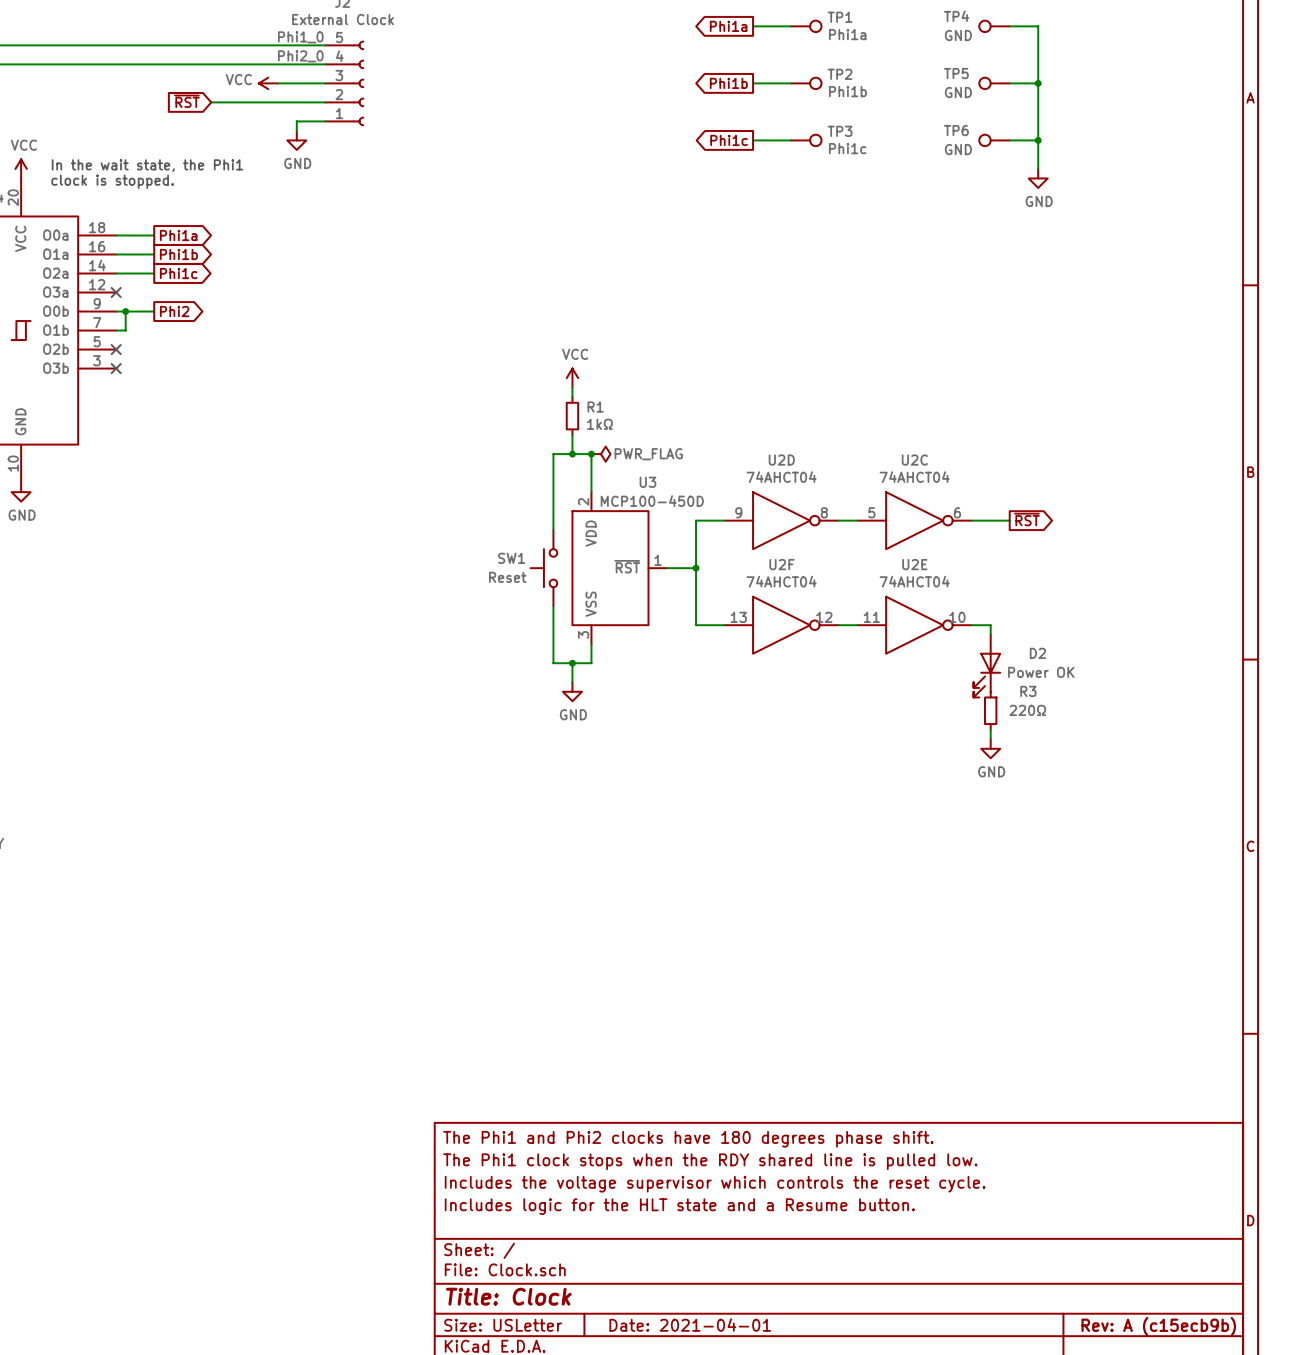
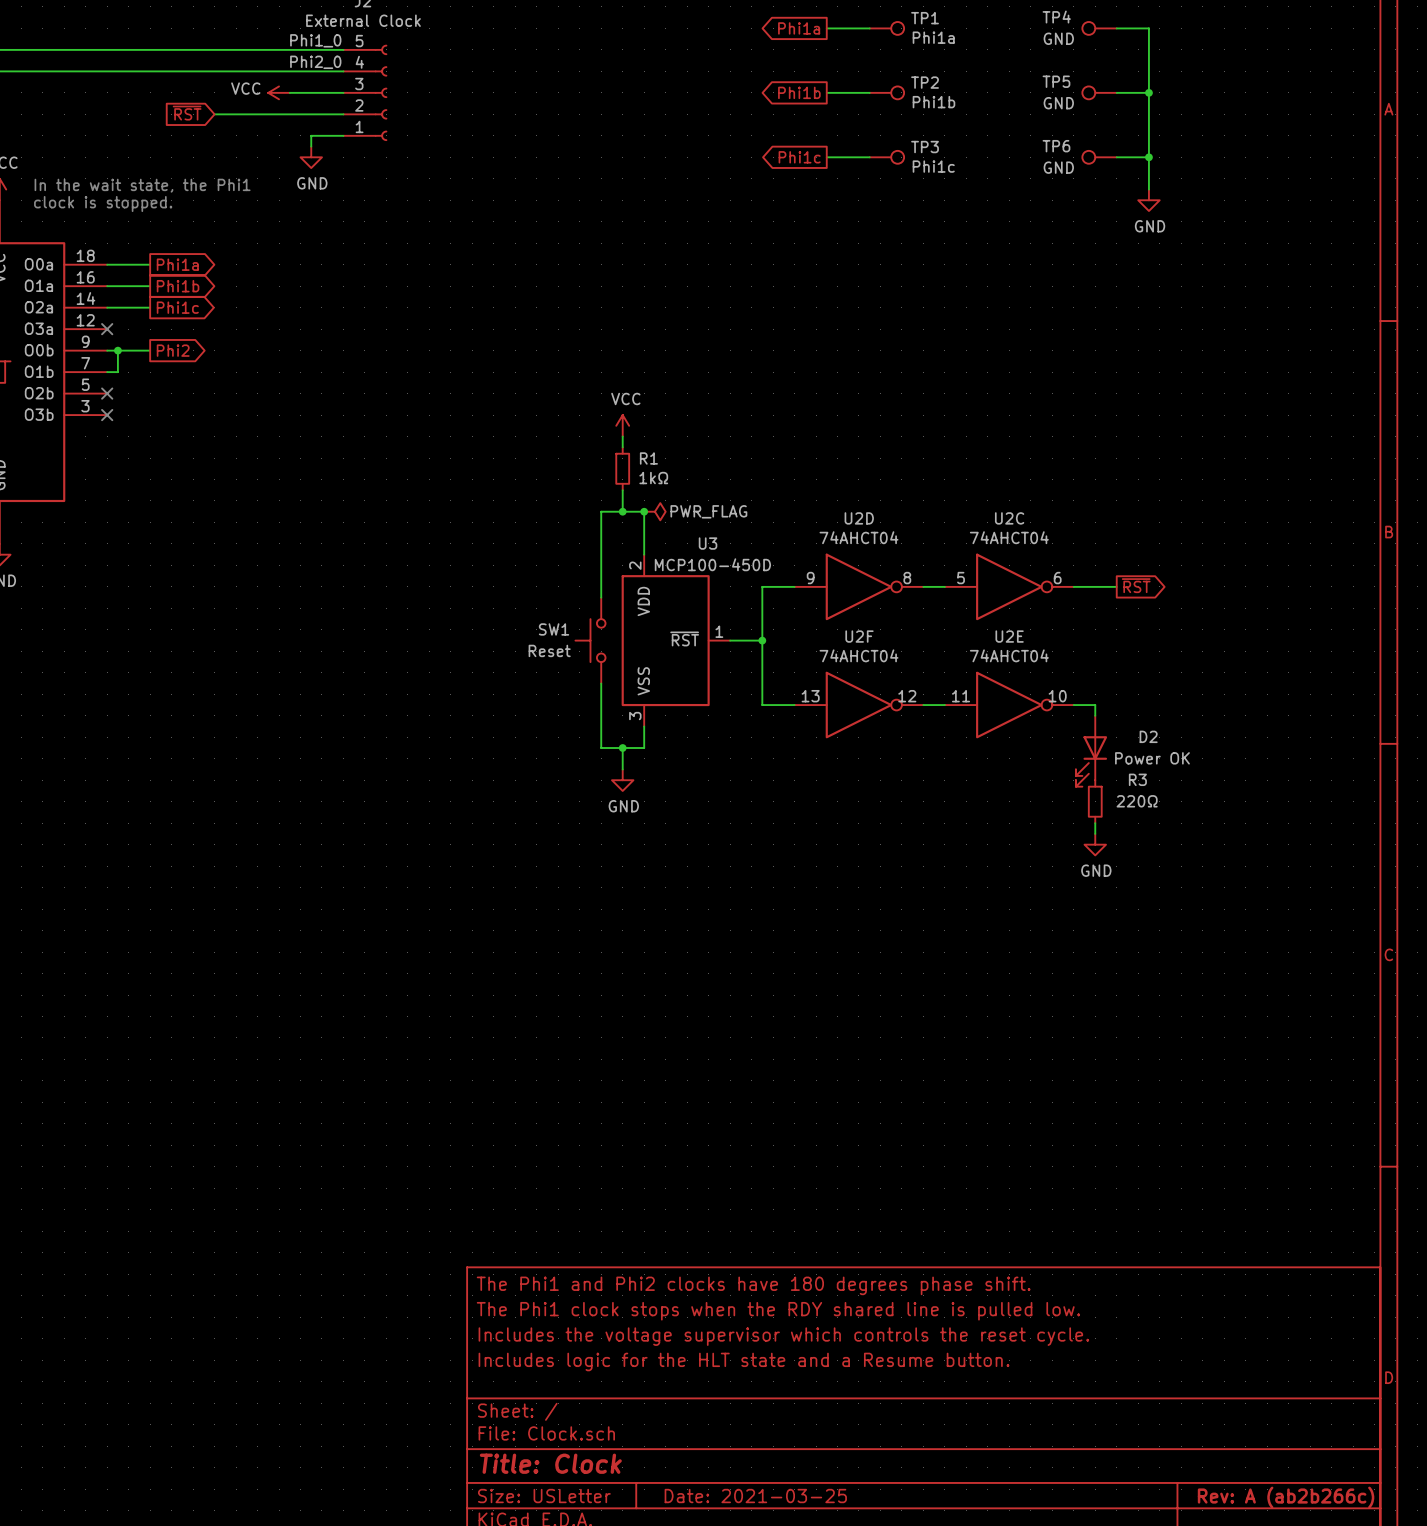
title block: Date: 2021-04-01 (690, 1325) -> Date: 2021-03-25 (755, 1496)
title block: Rev: A (c15ecb9b) (1158, 1326) -> Rev: A (ab2b266c) (1286, 1497)

